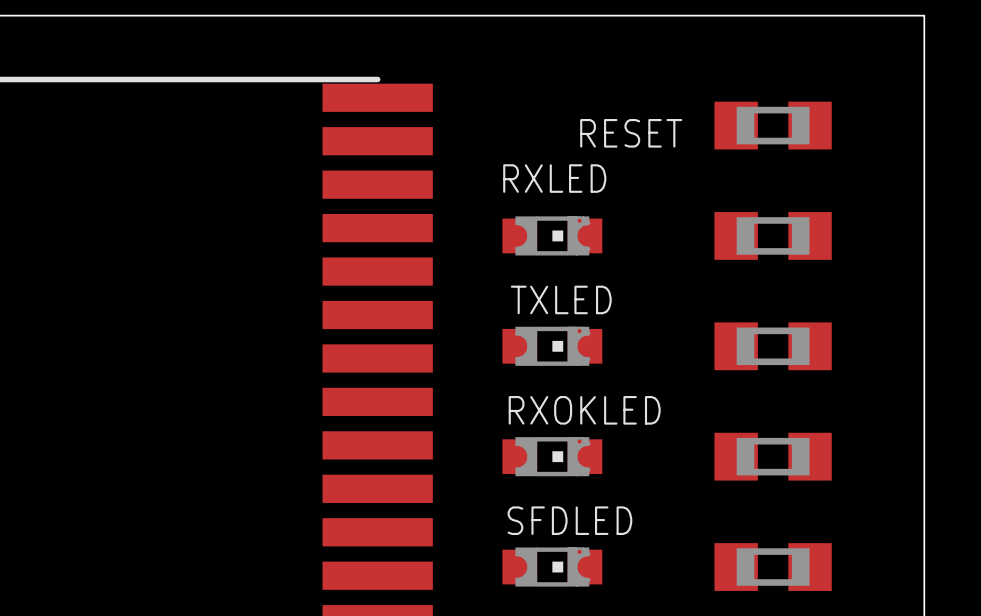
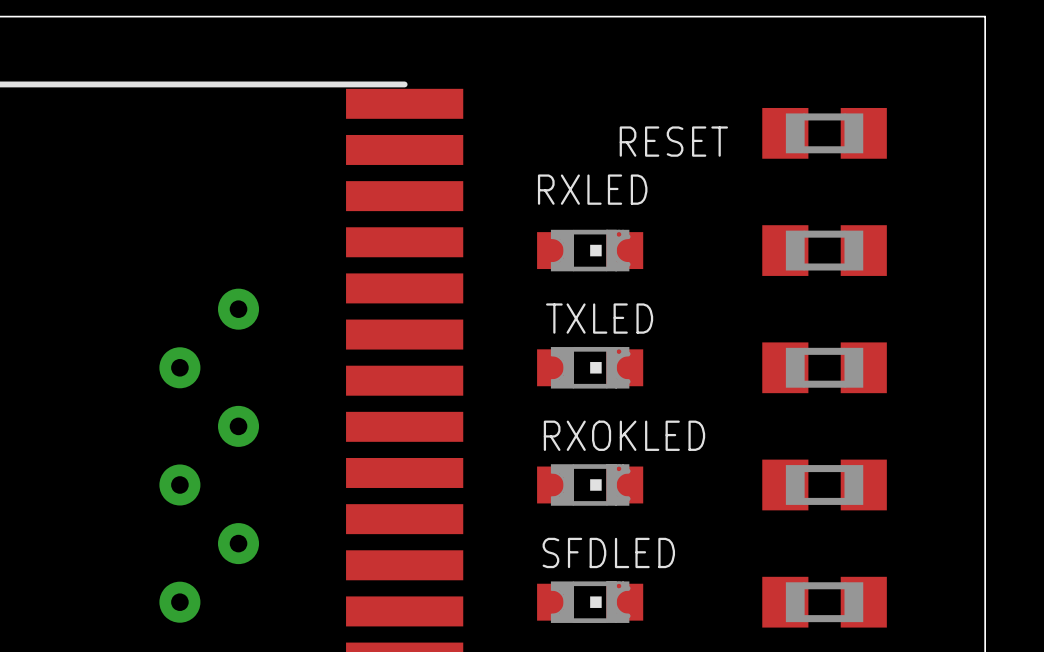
part: none -> (238, 309)
part: none -> (179, 367)
part: none -> (238, 426)
part: none -> (179, 484)
part: none -> (238, 543)
part: none -> (179, 602)

